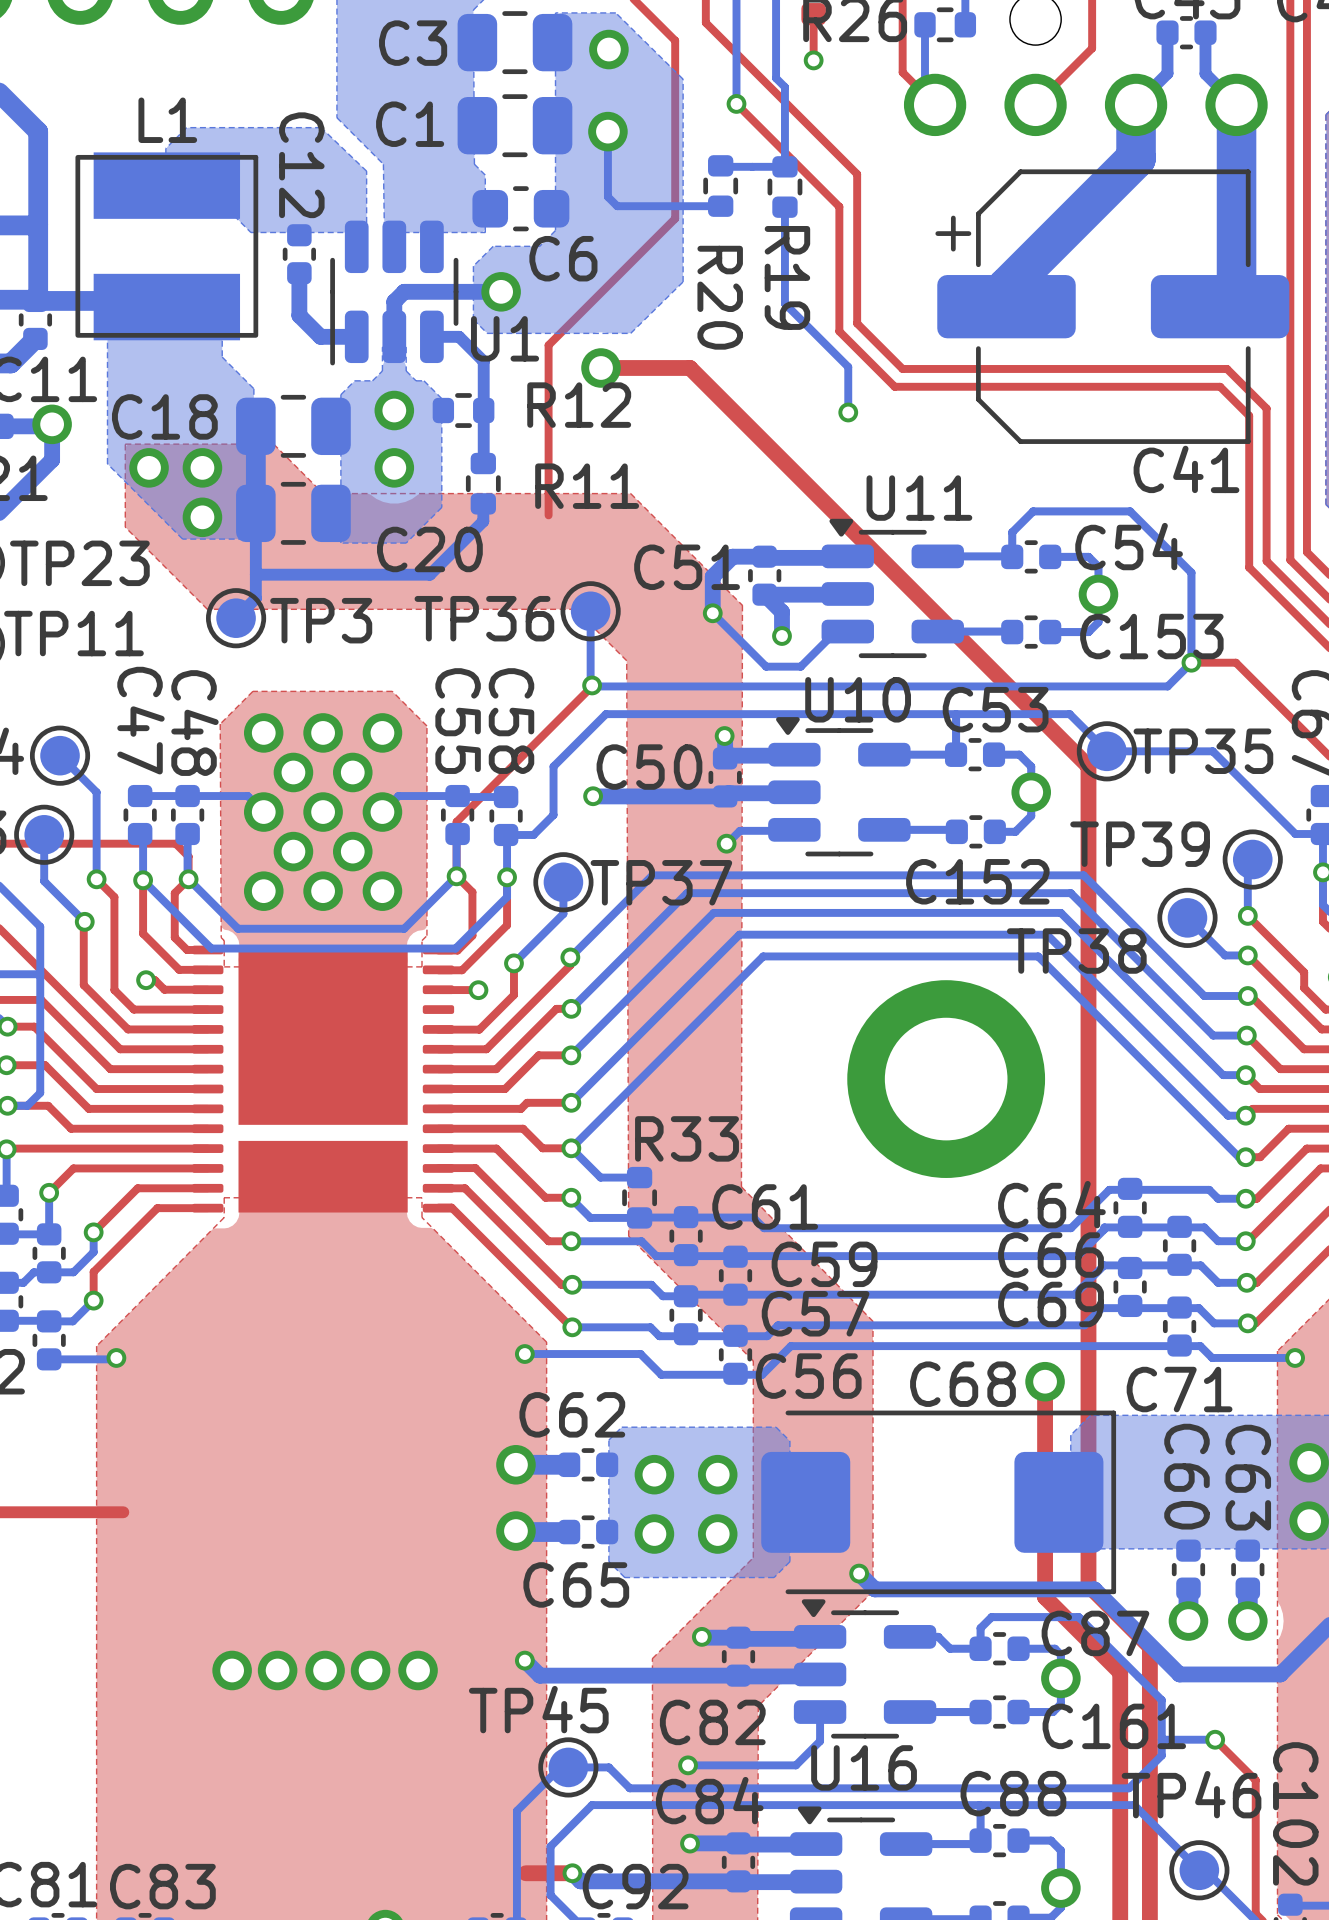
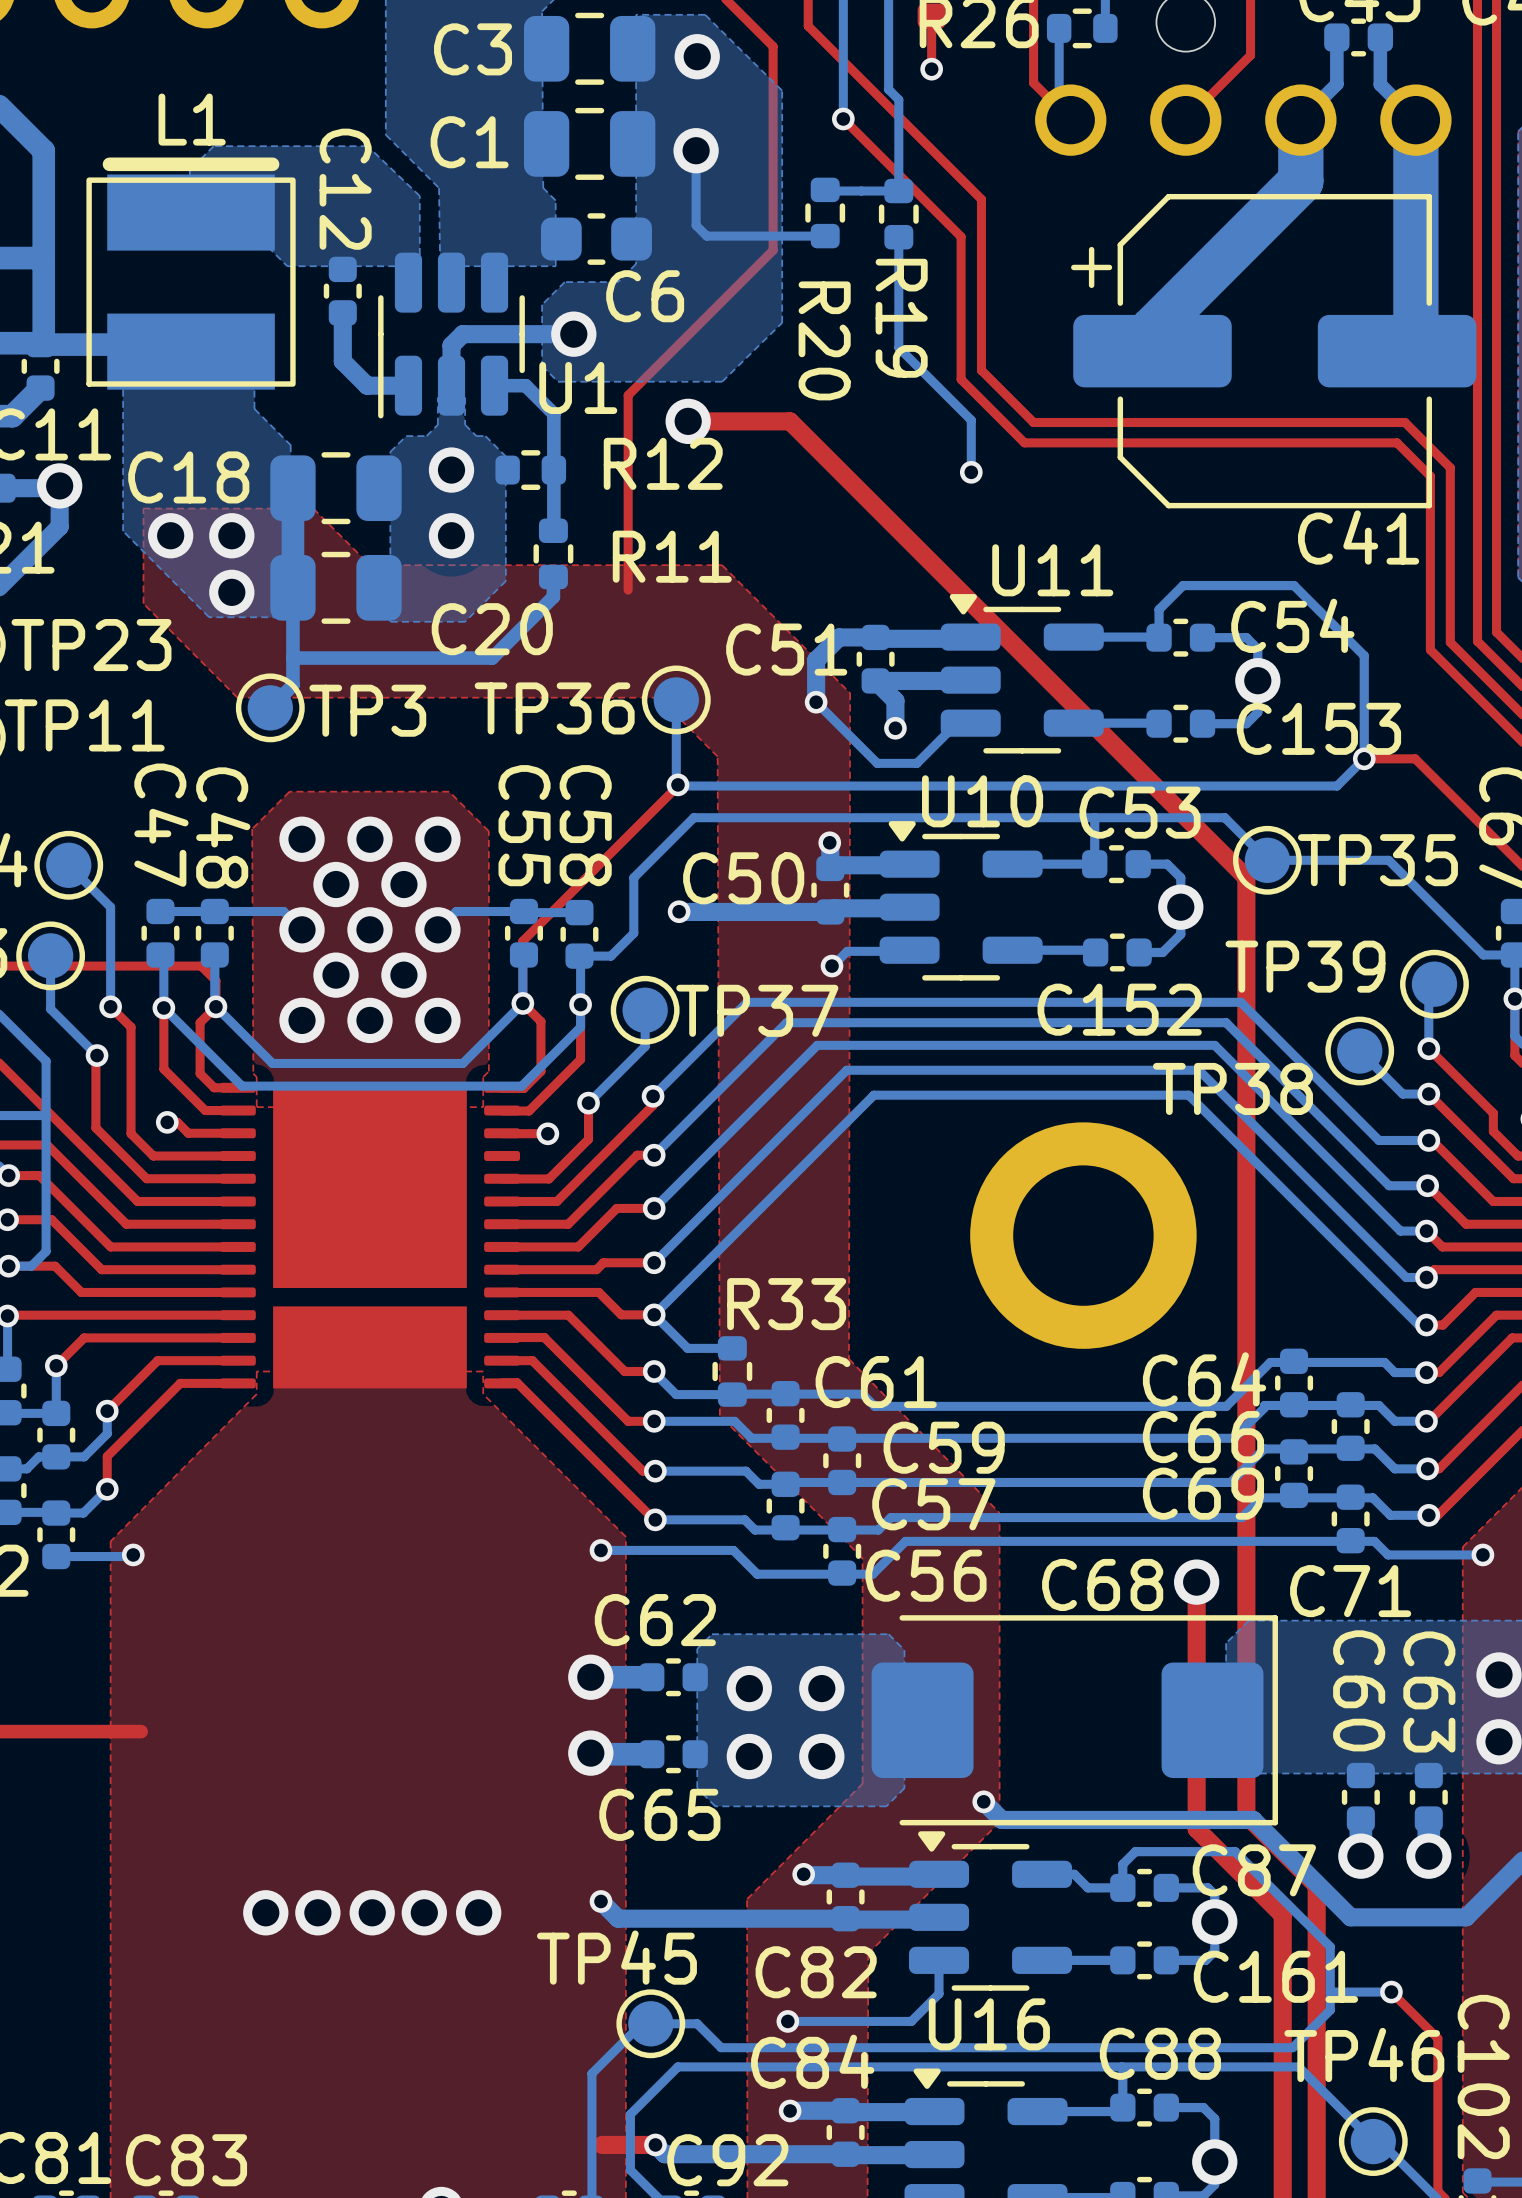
L1 name position: L1 (167, 120) -> L1 (192, 119)
L1 footprint: [75, 152, 259, 341] -> [86, 157, 296, 390]

